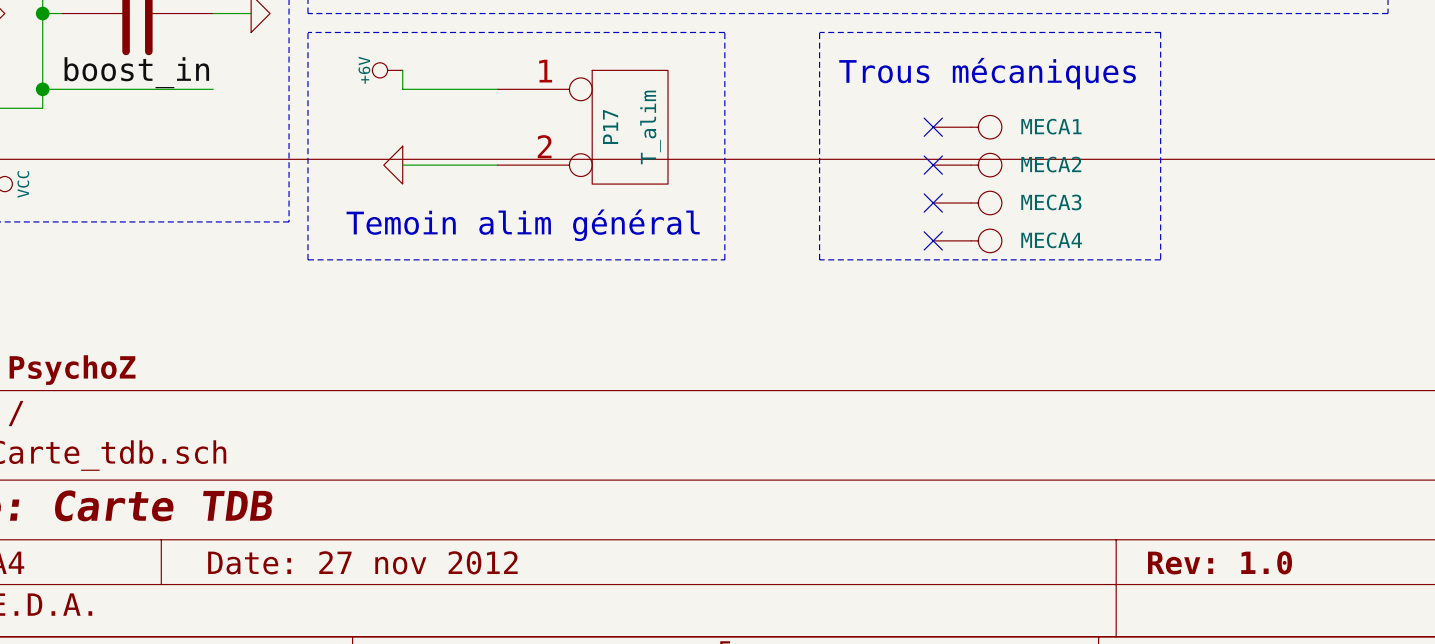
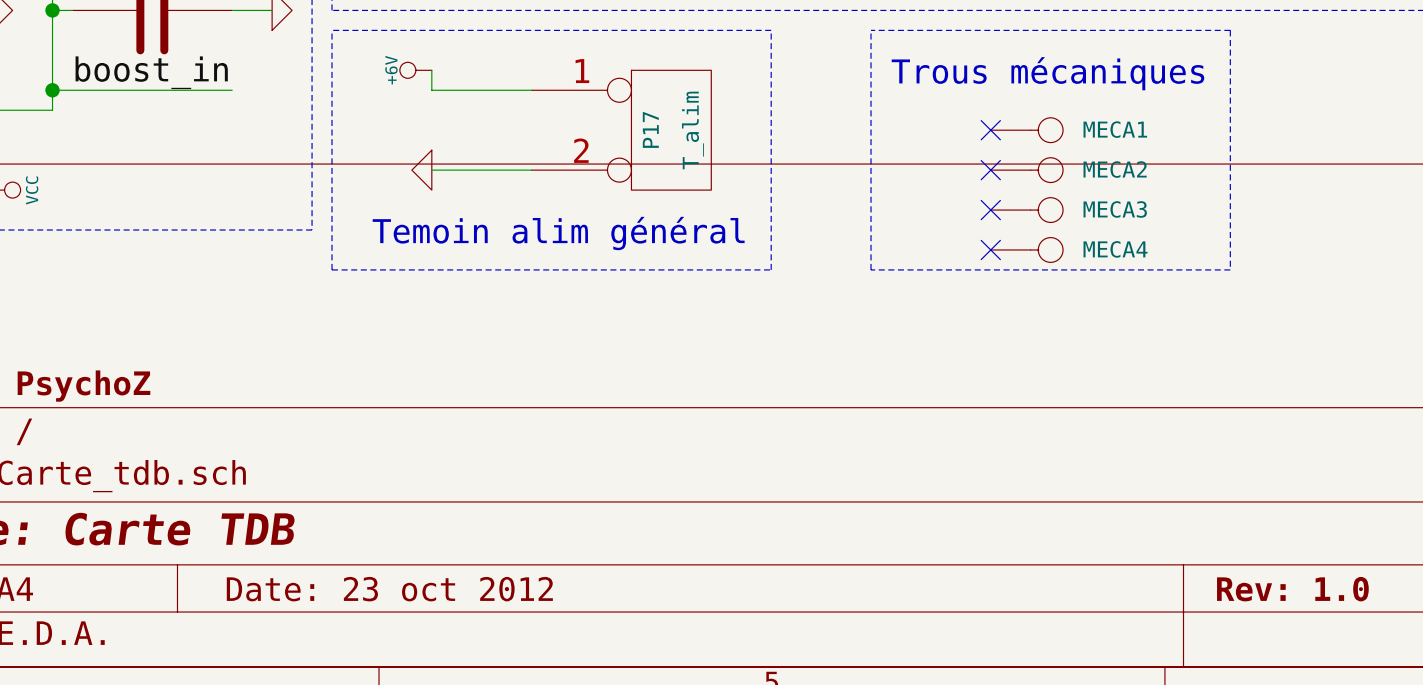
title block: Date: 27 nov 2012 (362, 562) -> Date: 23 oct 2012 (389, 589)

